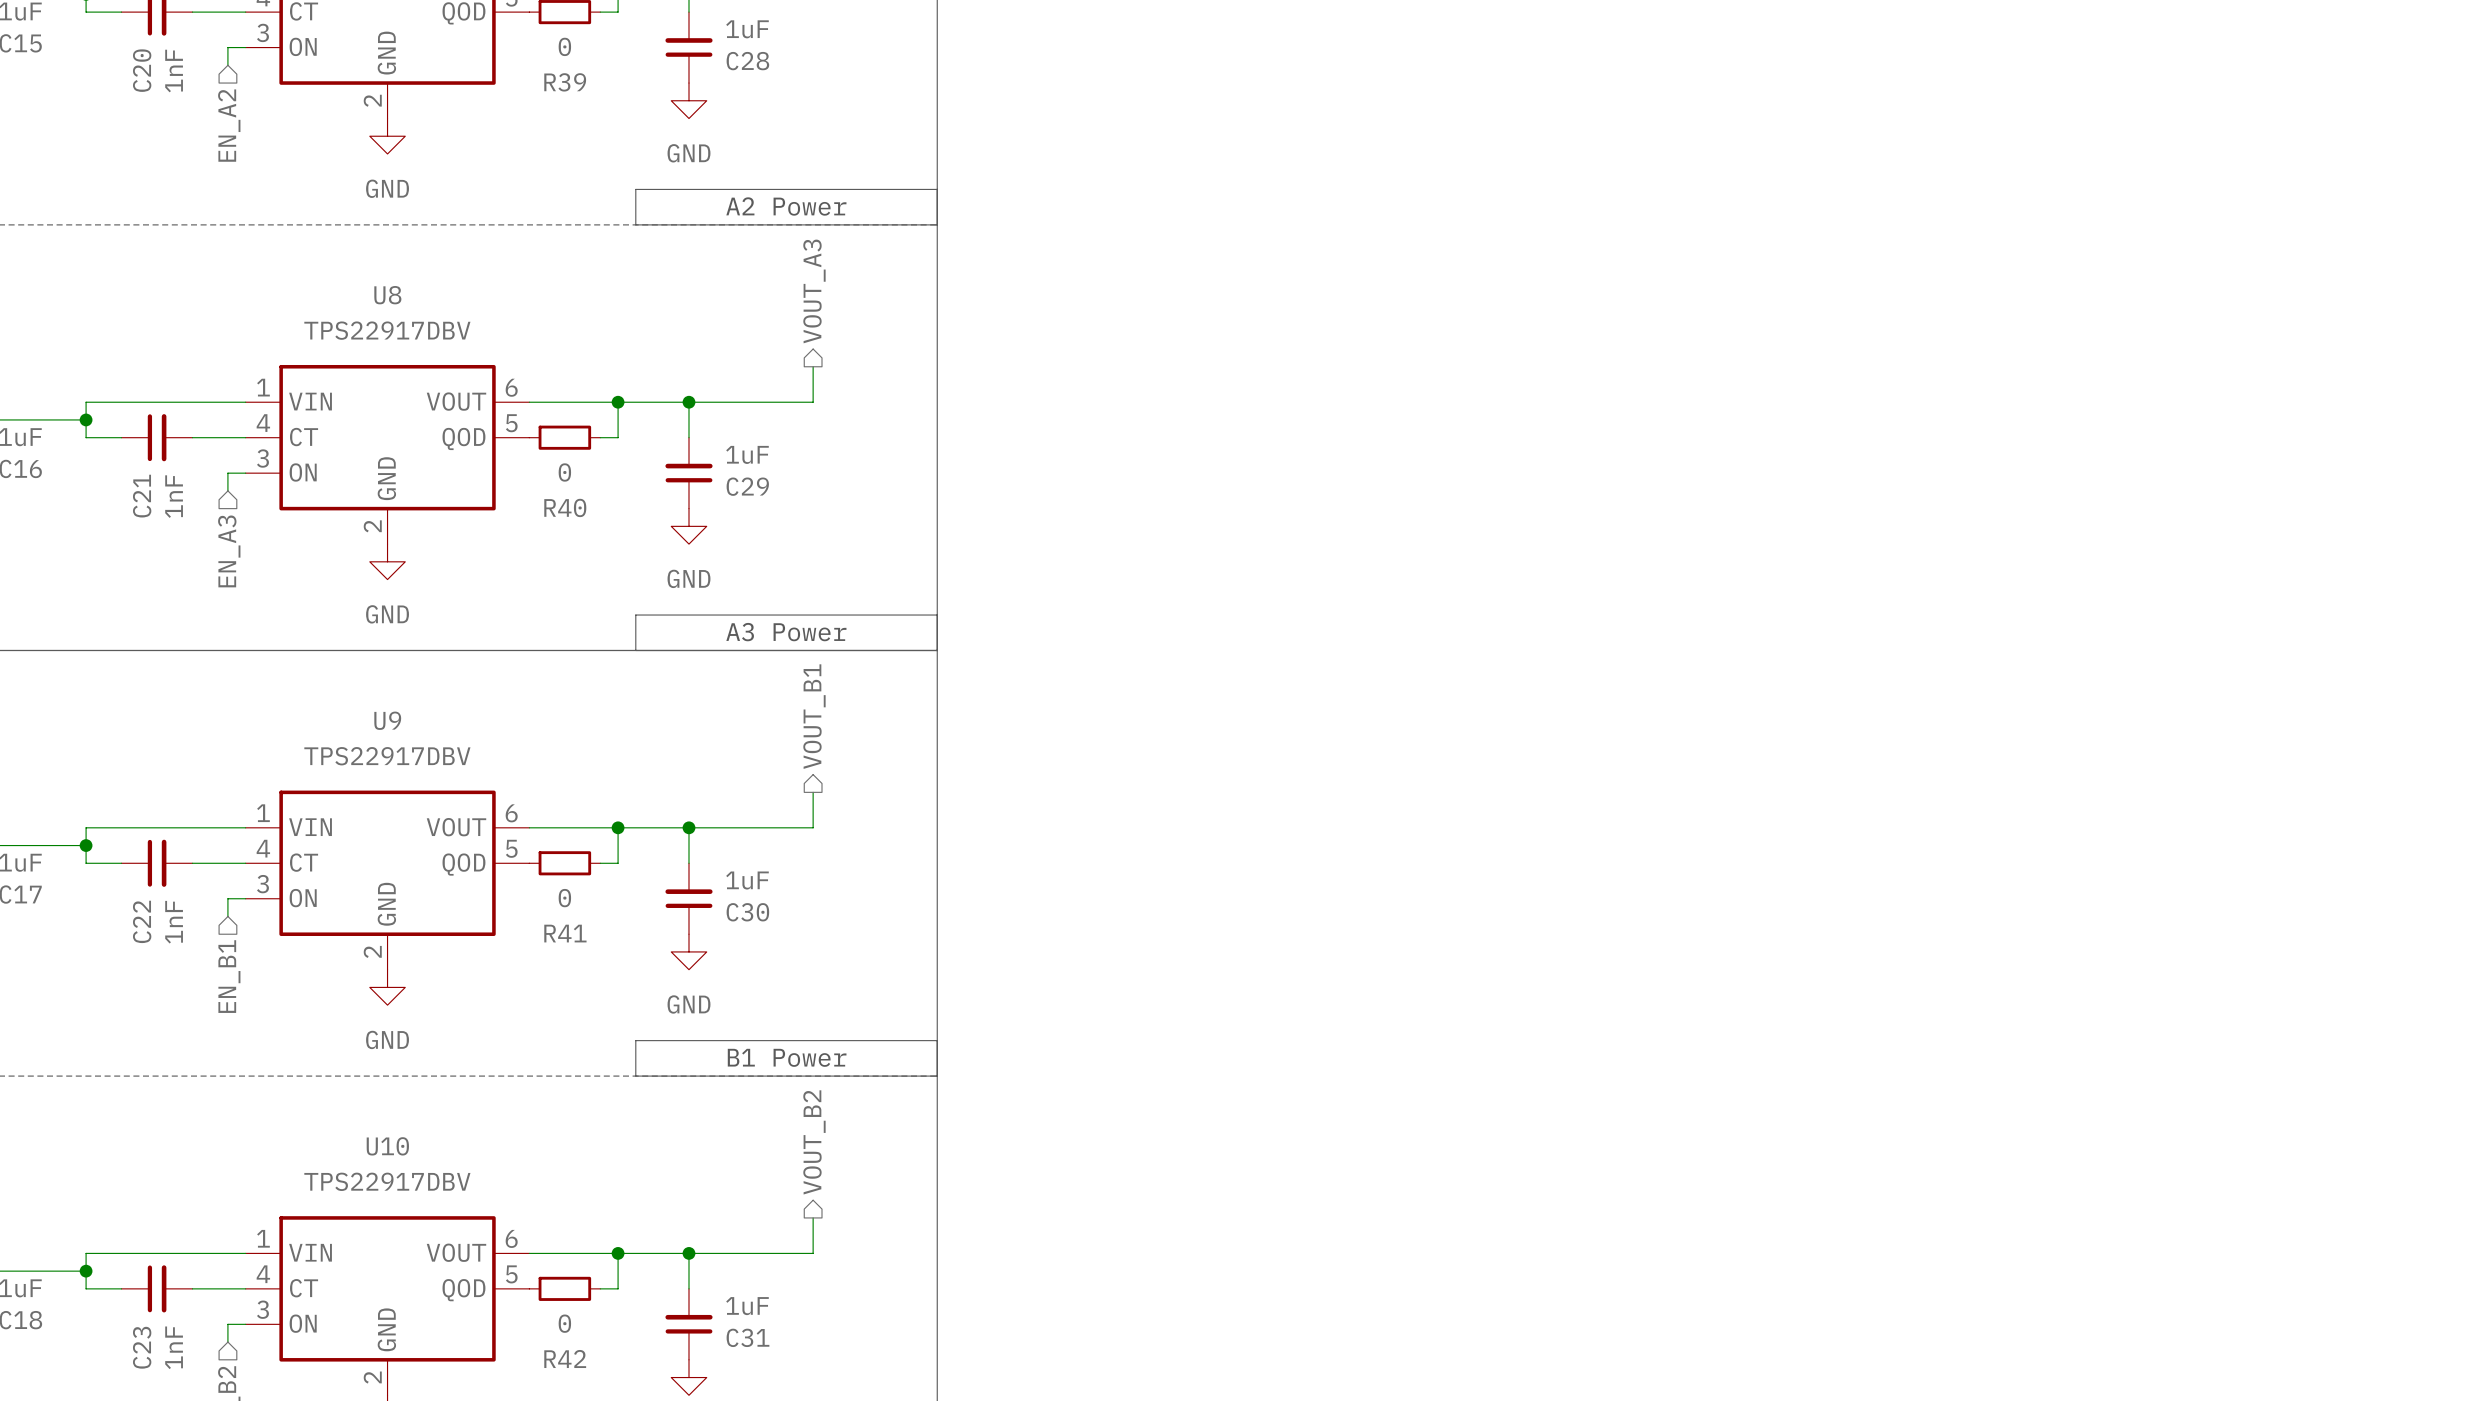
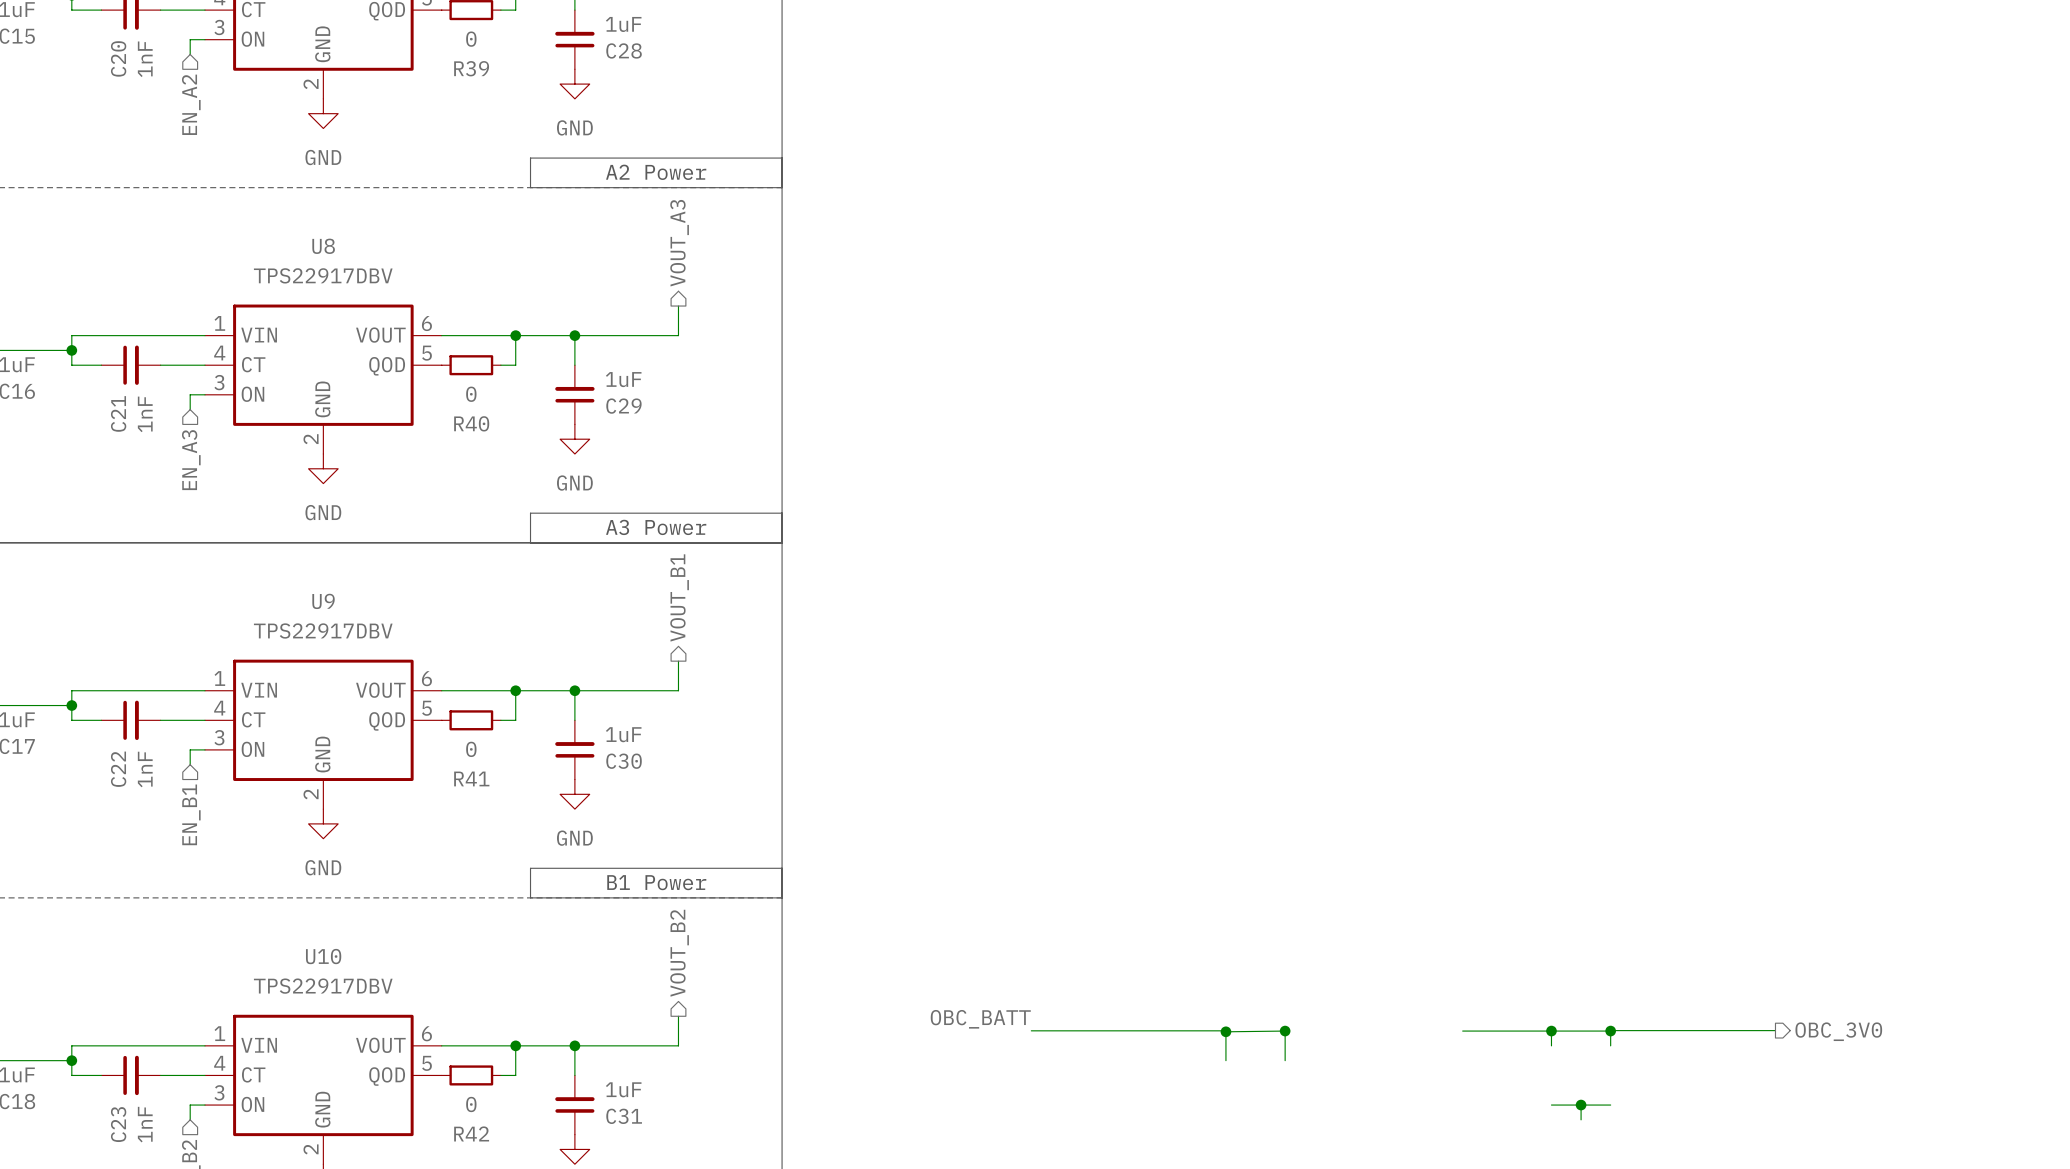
label: none -> OBC_BATT (980, 1019)
wire: none -> (1031, 1030) (1225, 1030) (1225, 1060)
junction: none -> (1285, 1031)
wire: none -> (1462, 1031) (1610, 1031)
wire: none -> (1551, 1031) (1551, 1045)
junction: none -> (1551, 1031)
junction: none -> (1610, 1031)
wire: none -> (1775, 1030) (1610, 1030) (1610, 1045)
wire: none -> (1225, 1031) (1285, 1031) (1285, 1060)
junction: none -> (1225, 1031)
hierarchical label: none -> OBC_3V0 (1838, 1031)
wire: none -> (1551, 1105) (1610, 1105)
wire: none -> (1581, 1105) (1581, 1119)
junction: none -> (1581, 1105)

